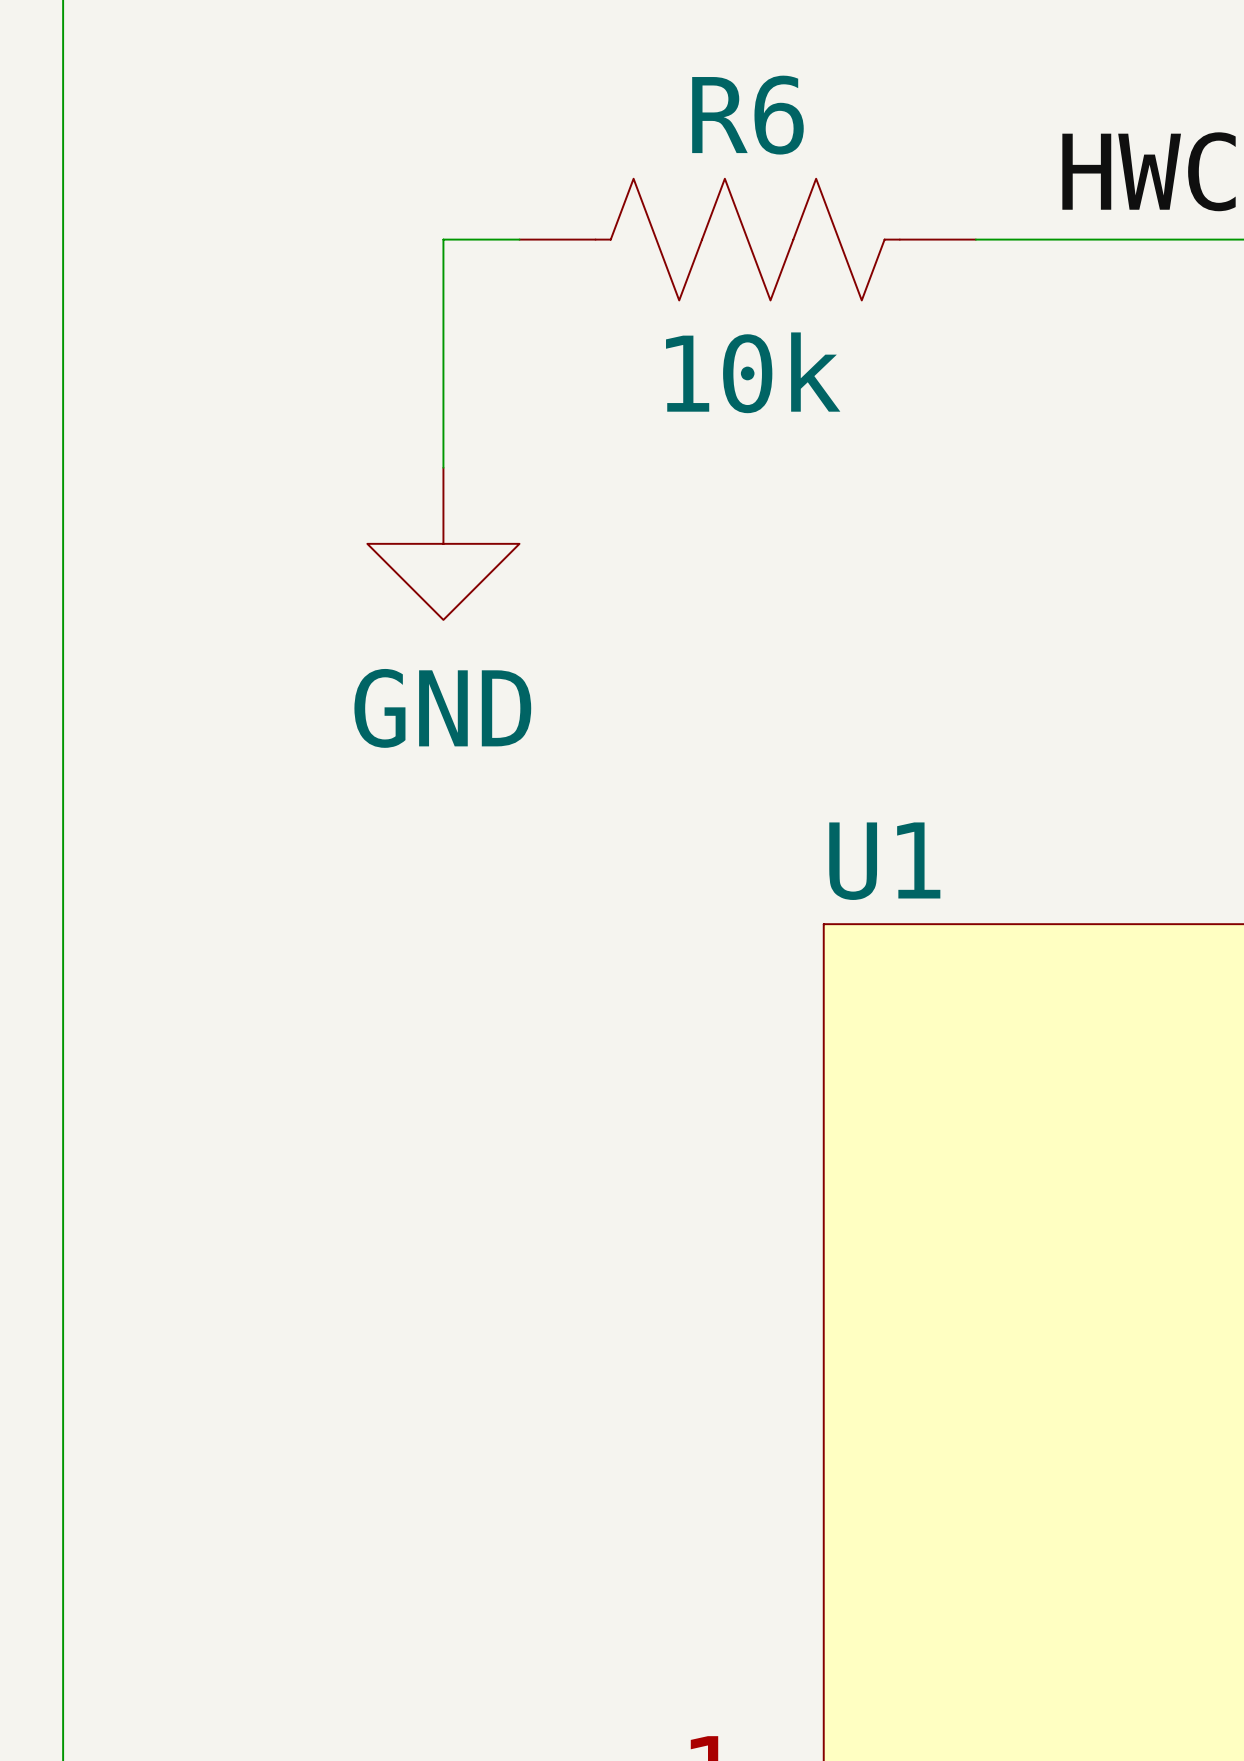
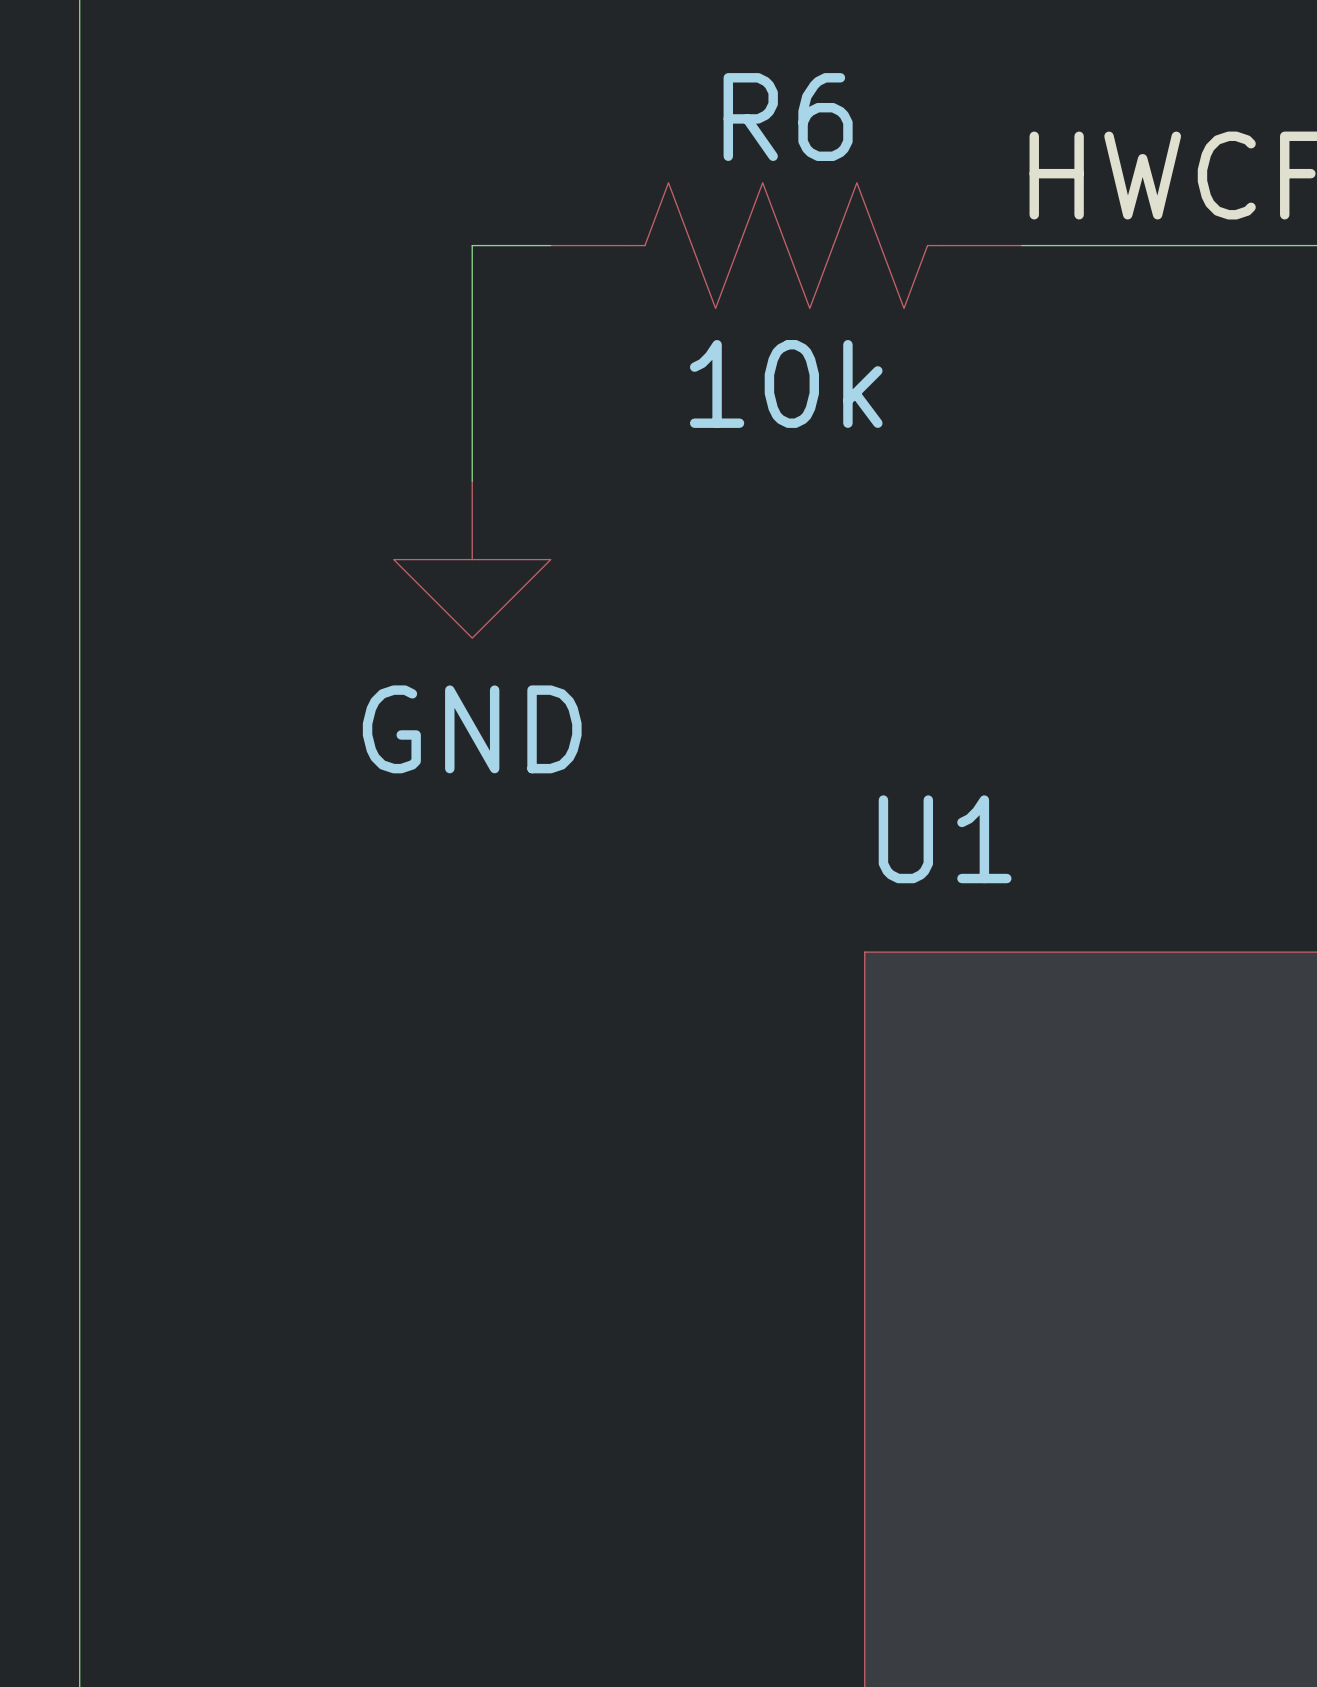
U1 name position: U1 (884, 861) -> U1 (945, 839)

